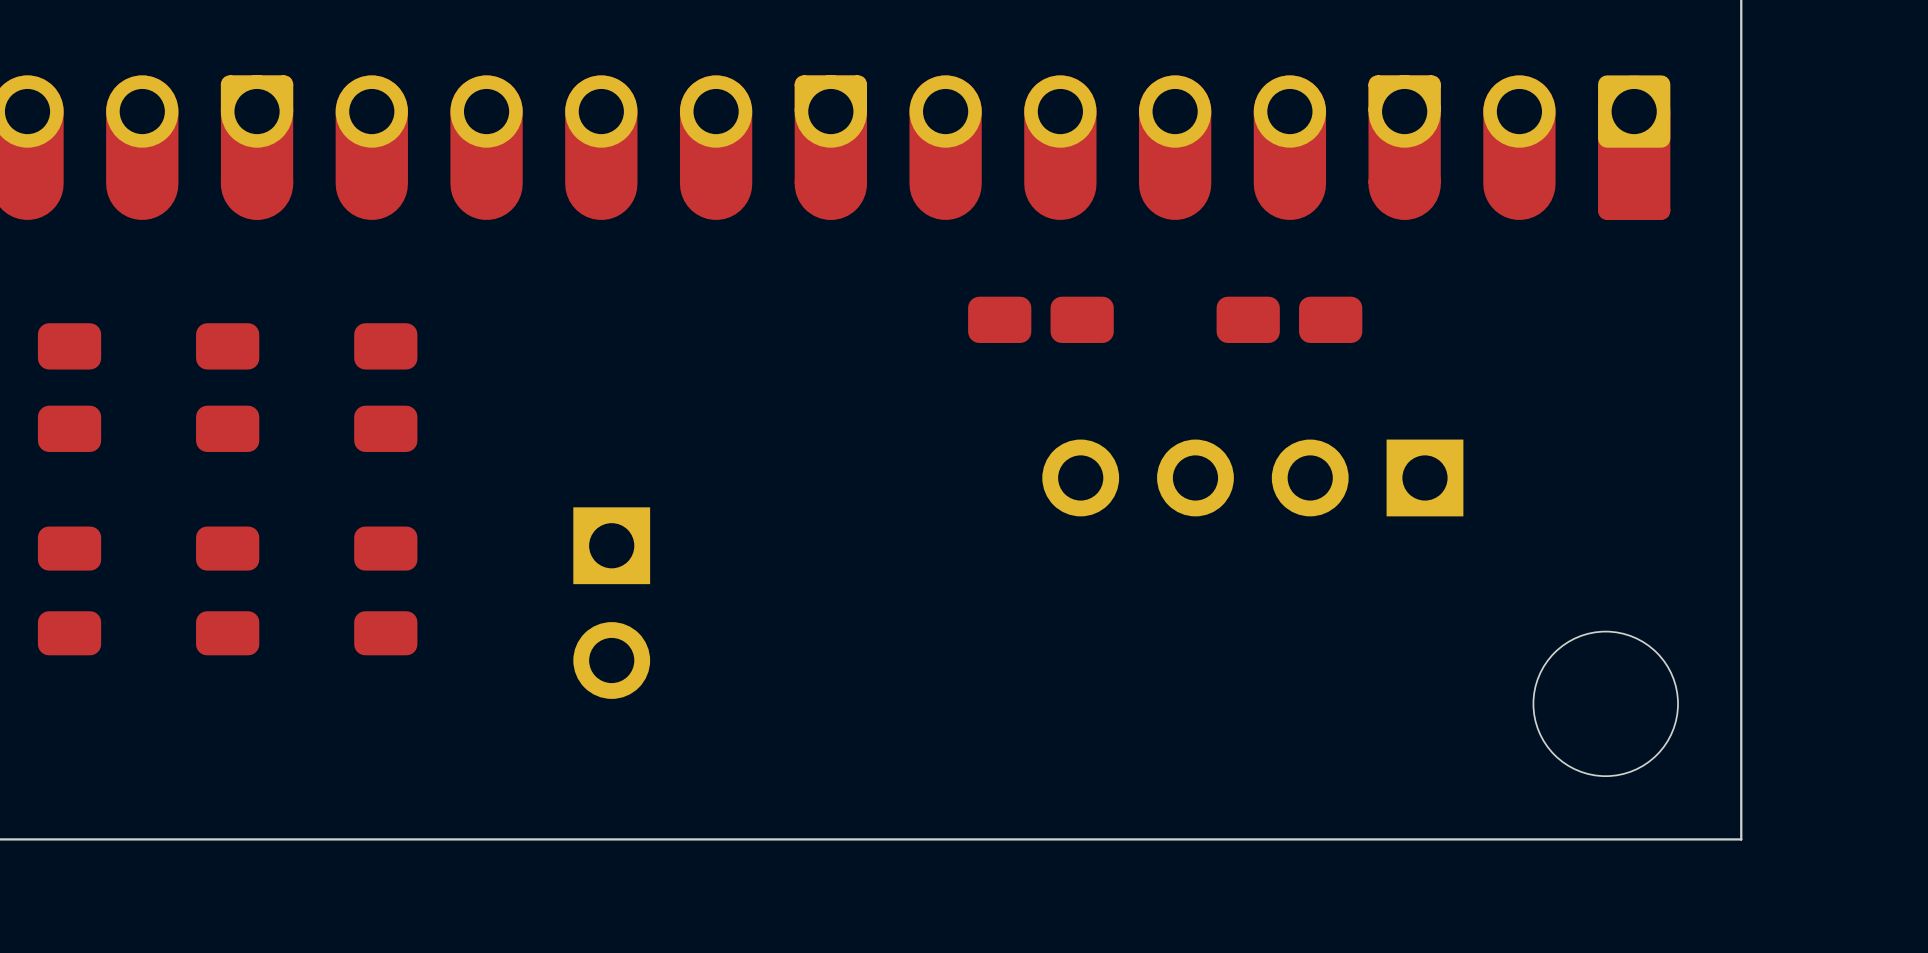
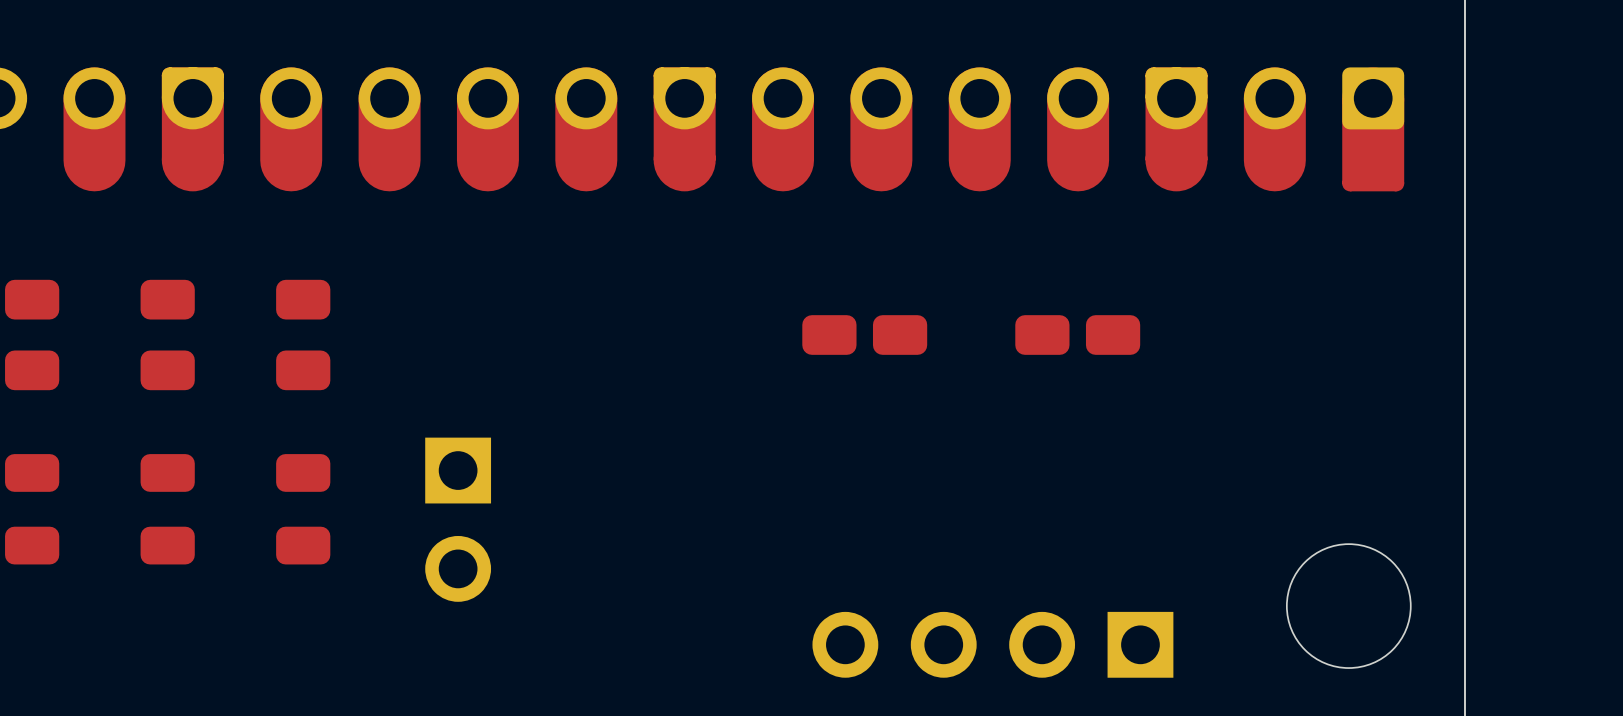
part position: (1040, 319) -> (864, 335)
part position: (1289, 319) -> (1077, 335)
part position: (1252, 477) -> (992, 644)
part position: (611, 603) -> (458, 519)

